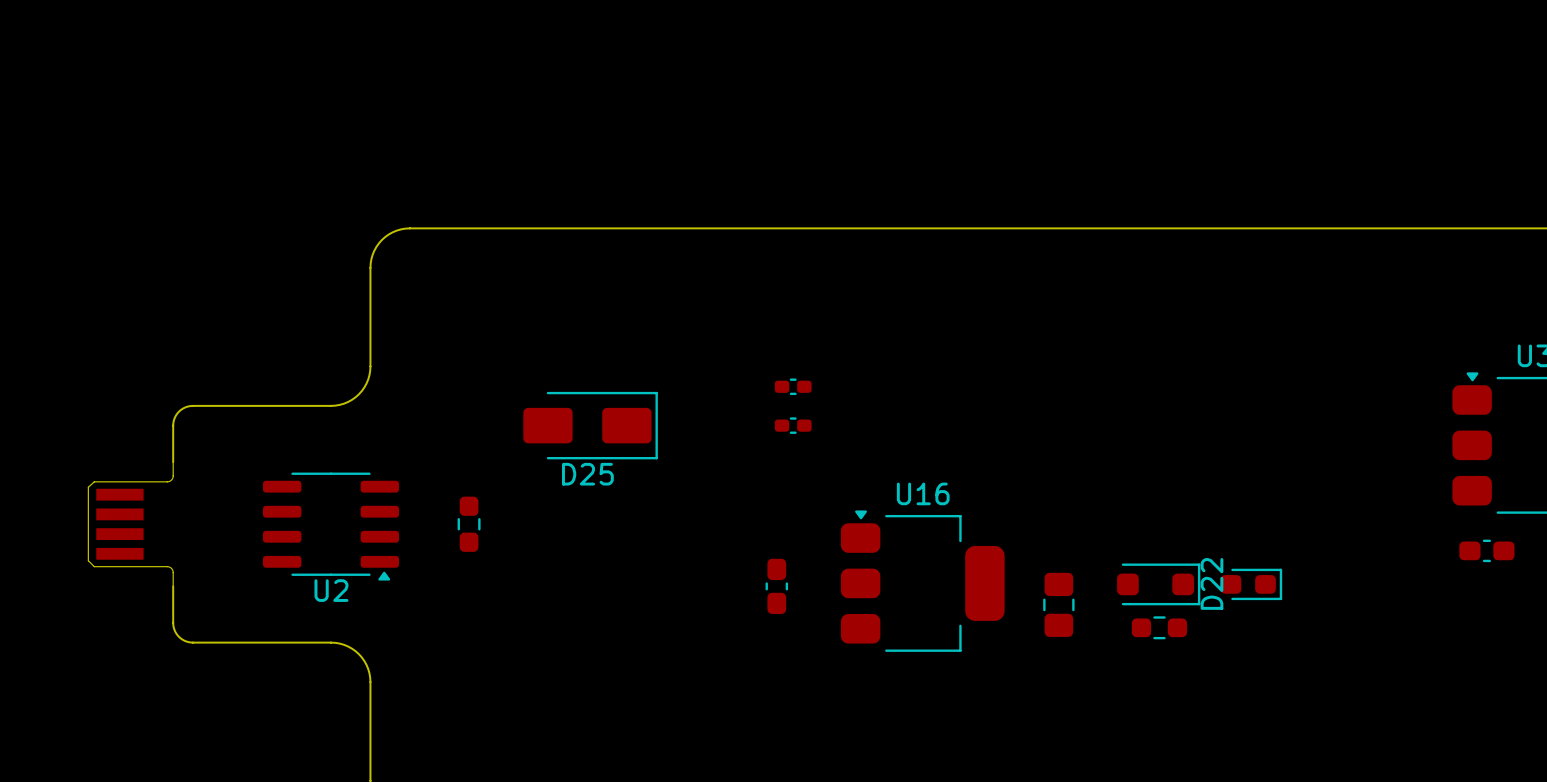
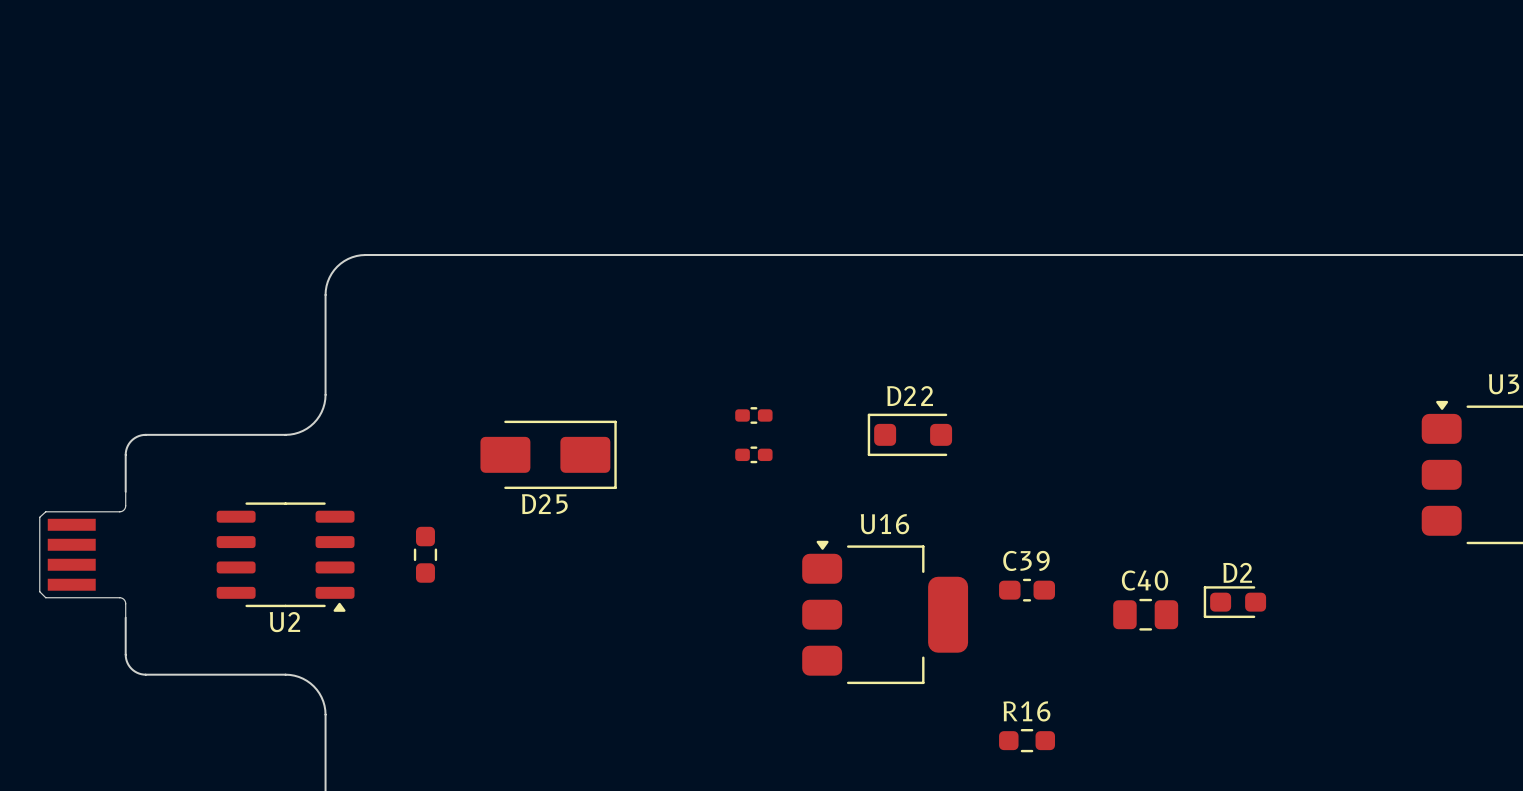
part: (1486, 550) -> none
C39: none -> (1027, 590)
D2: none -> (1234, 602)
C40: none -> (1145, 614)
D22 name position: D22 (1211, 583) -> D22 (910, 396)
D22 rotation: 0° (1158, 584) -> 180° (909, 434)
D22 position: (1158, 584) -> (909, 434)
part: (1251, 584) -> none
part: (776, 586) -> none
part: (1058, 604) -> none
part: (1159, 627) -> none
R16: none -> (1027, 740)

